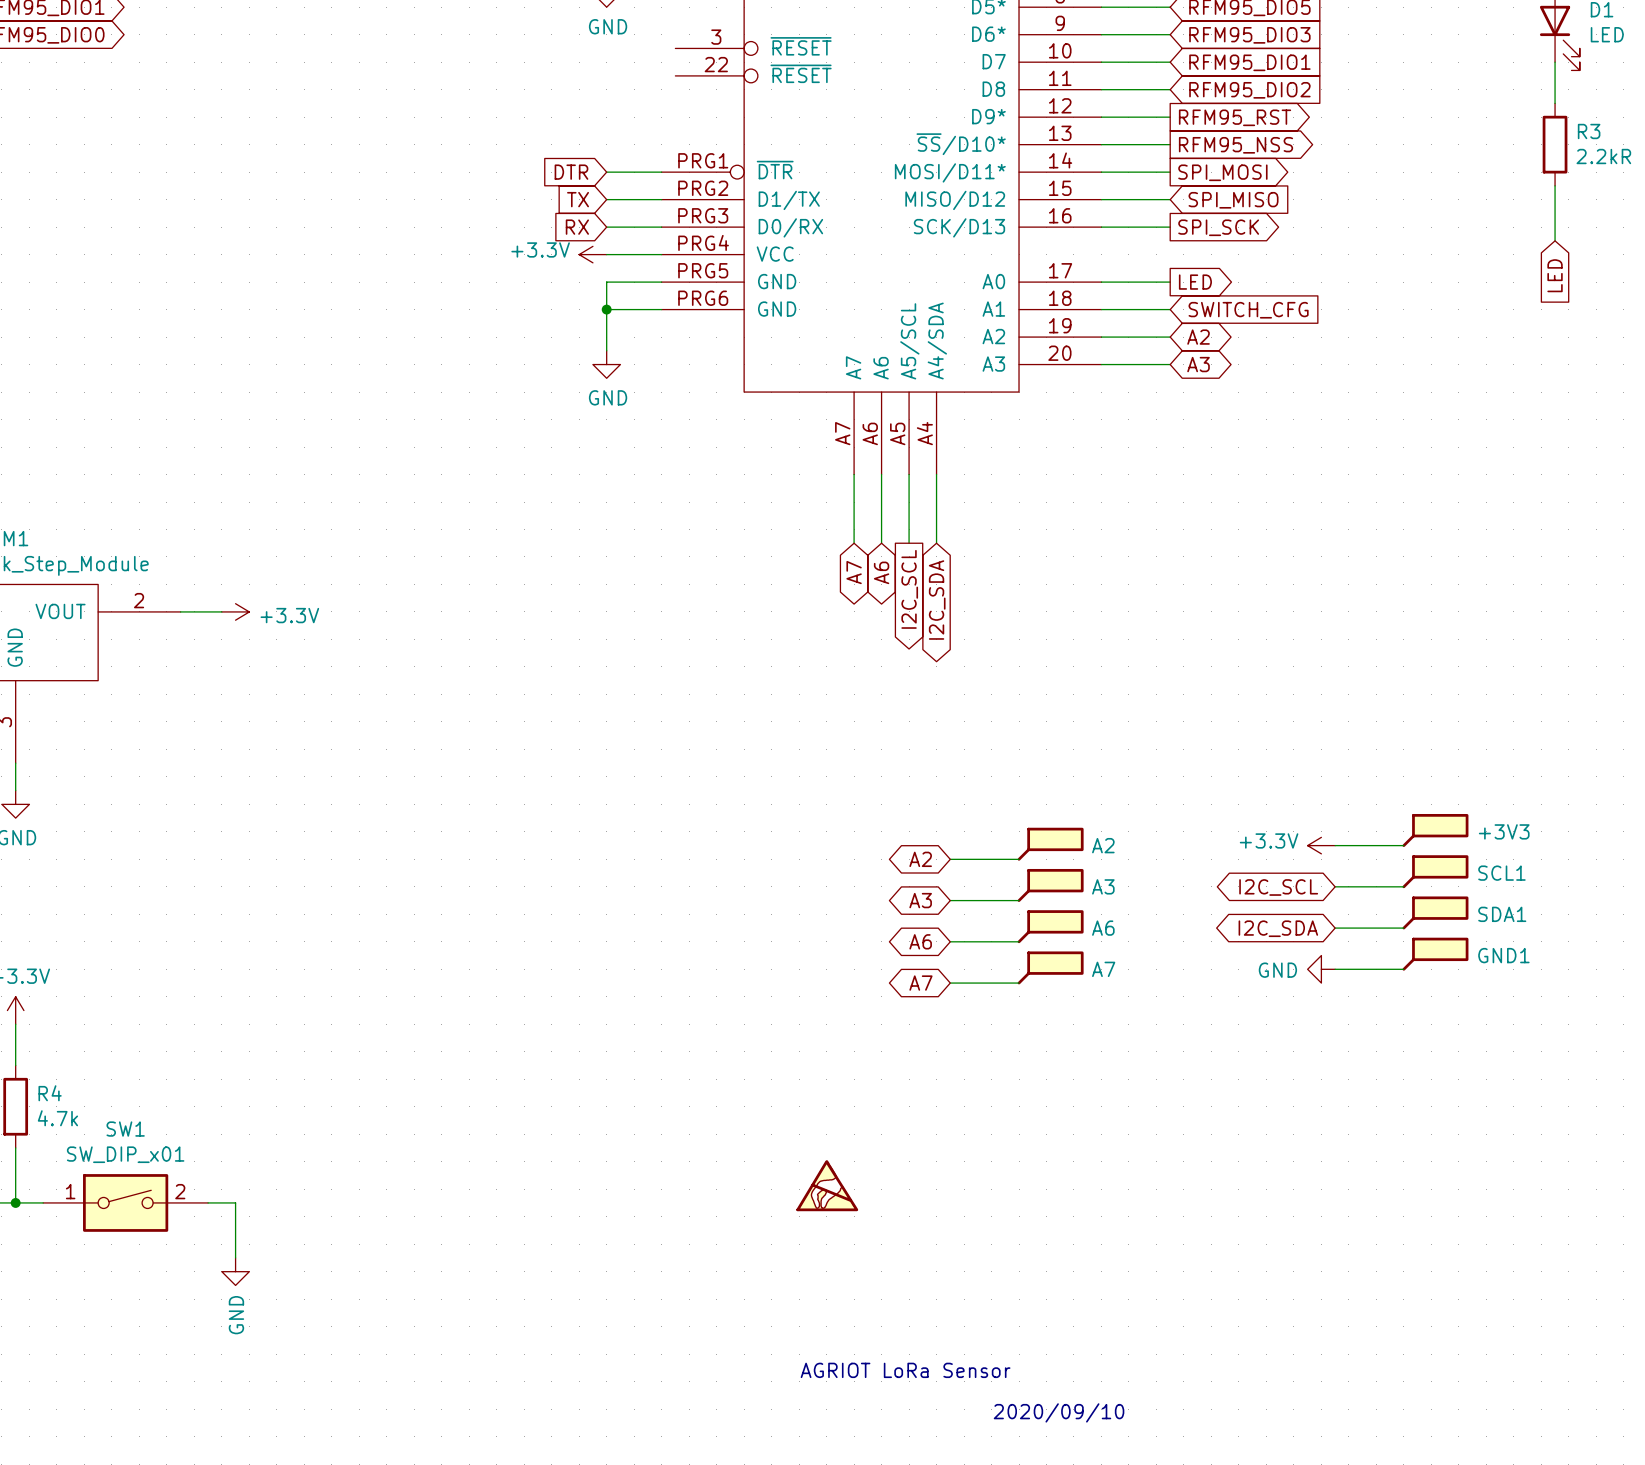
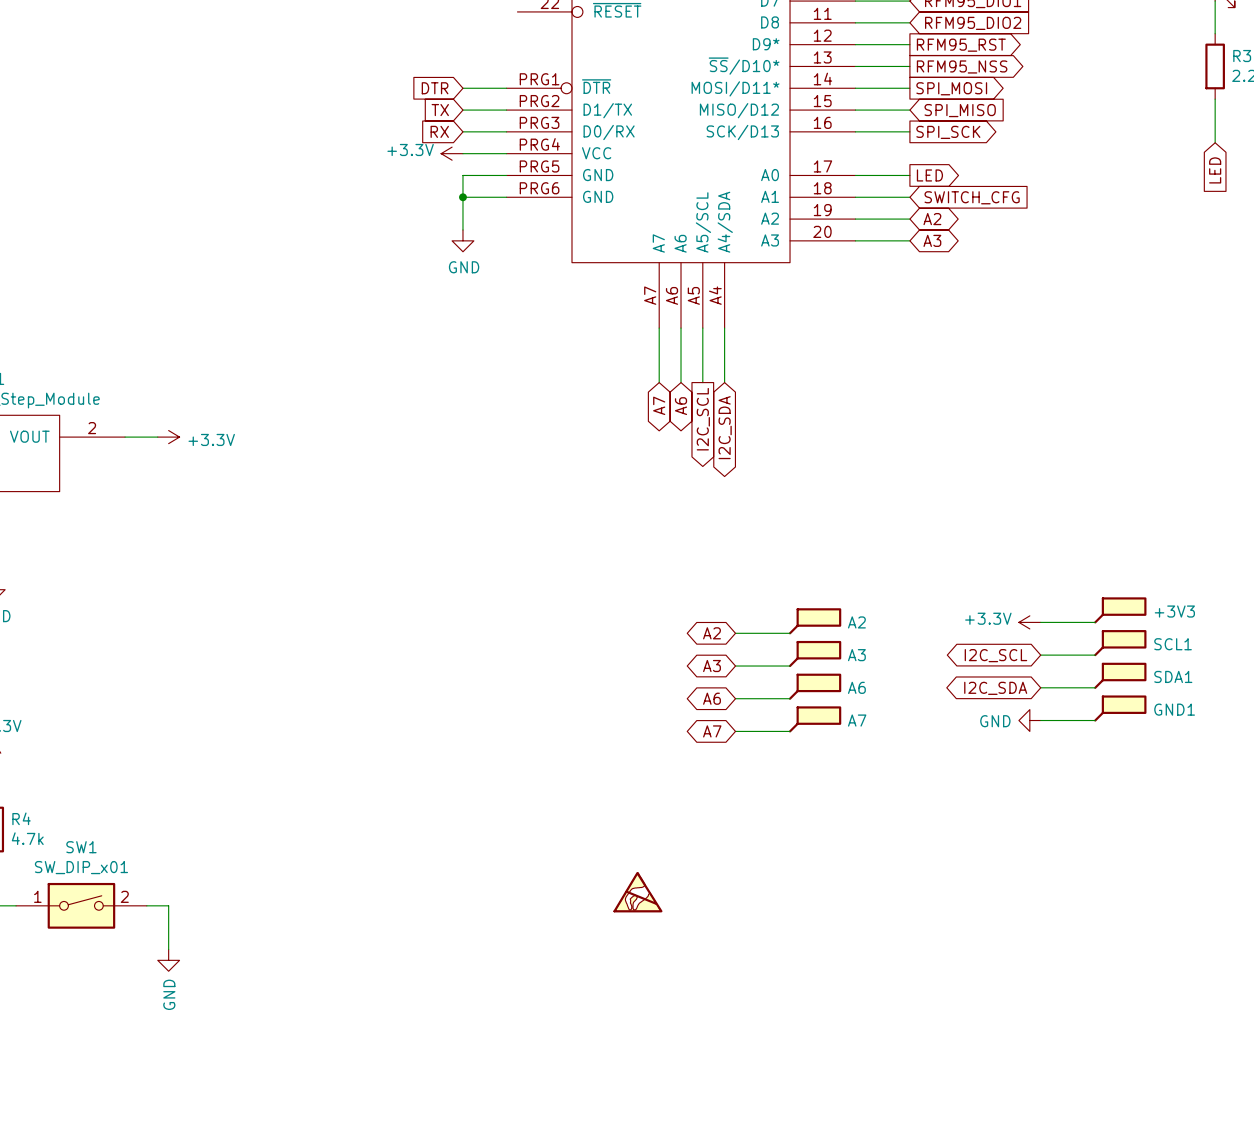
text: AGRIOT LoRa Sensor (905, 1370) -> none
text: 2020/09/10 (1059, 1412) -> none

